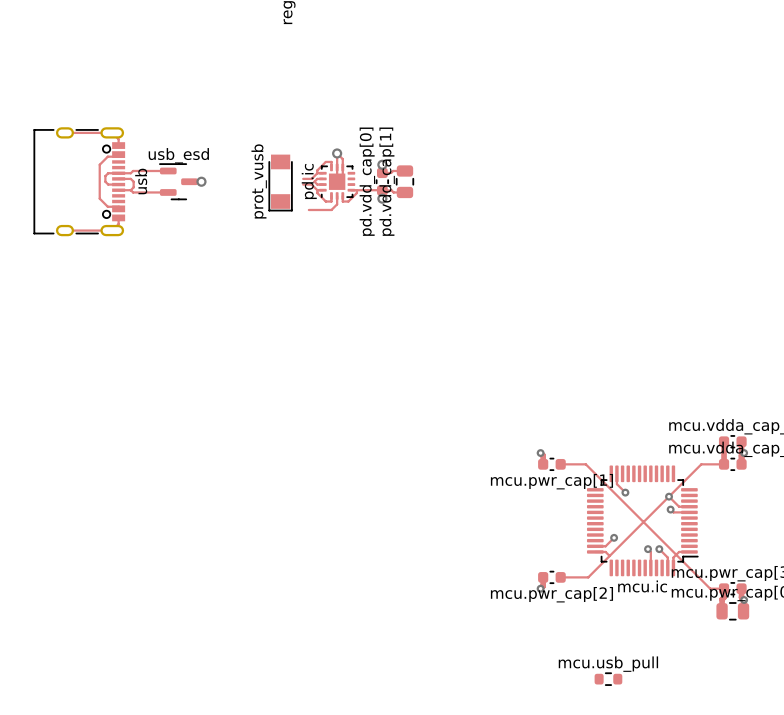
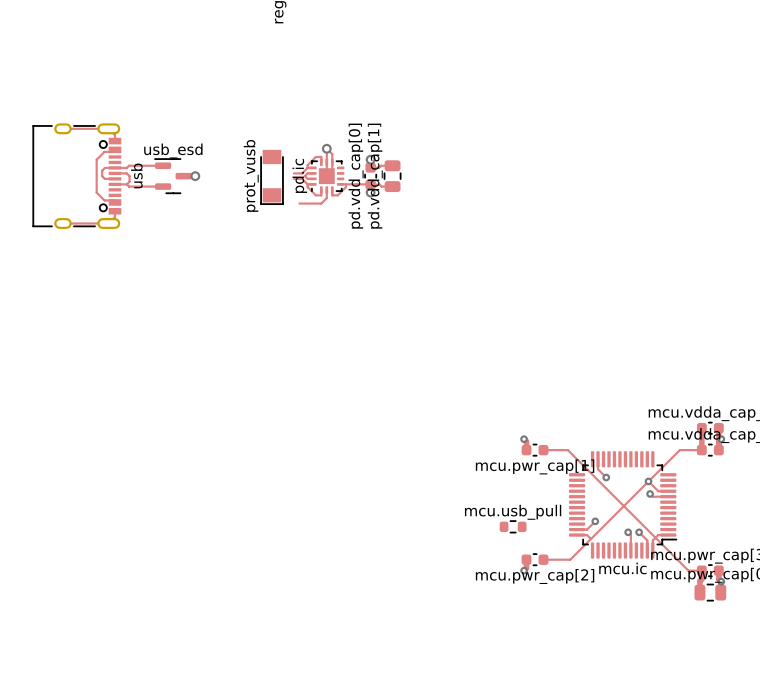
mcu.usb_pull position: (608, 679) -> (513, 526)

